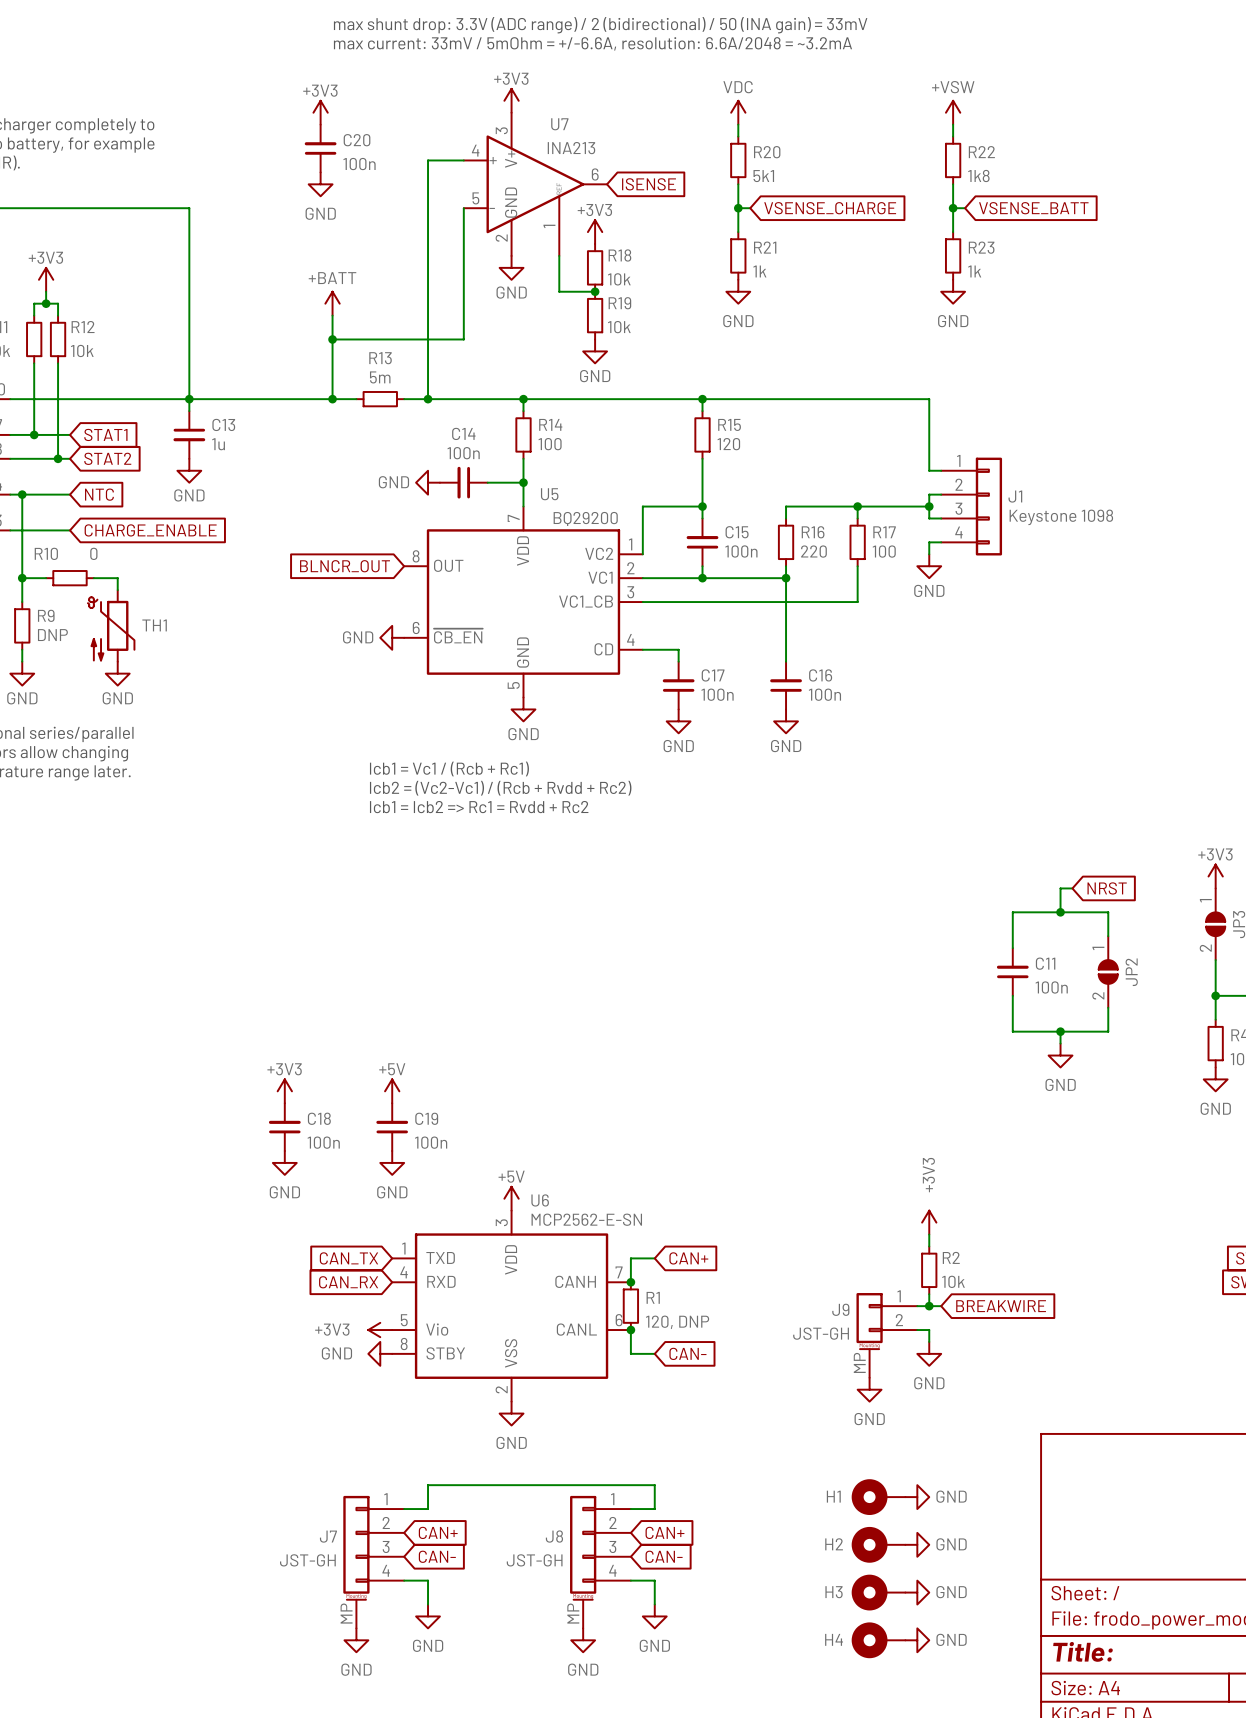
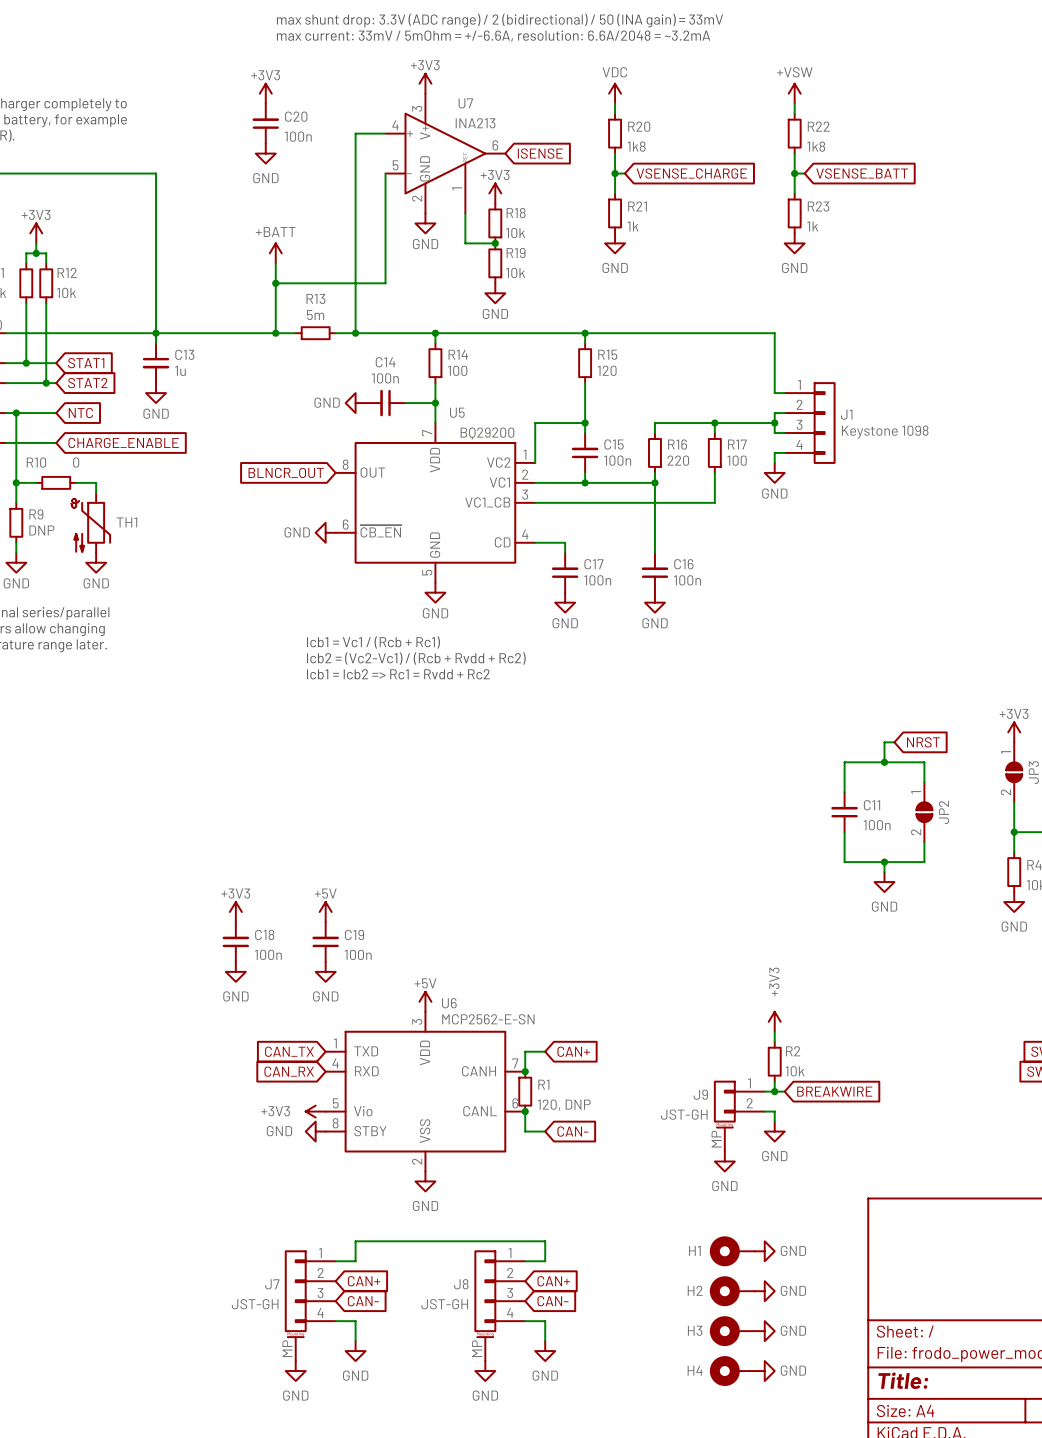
R20 value: 5k1 (763, 176) -> 1k8 (636, 146)

